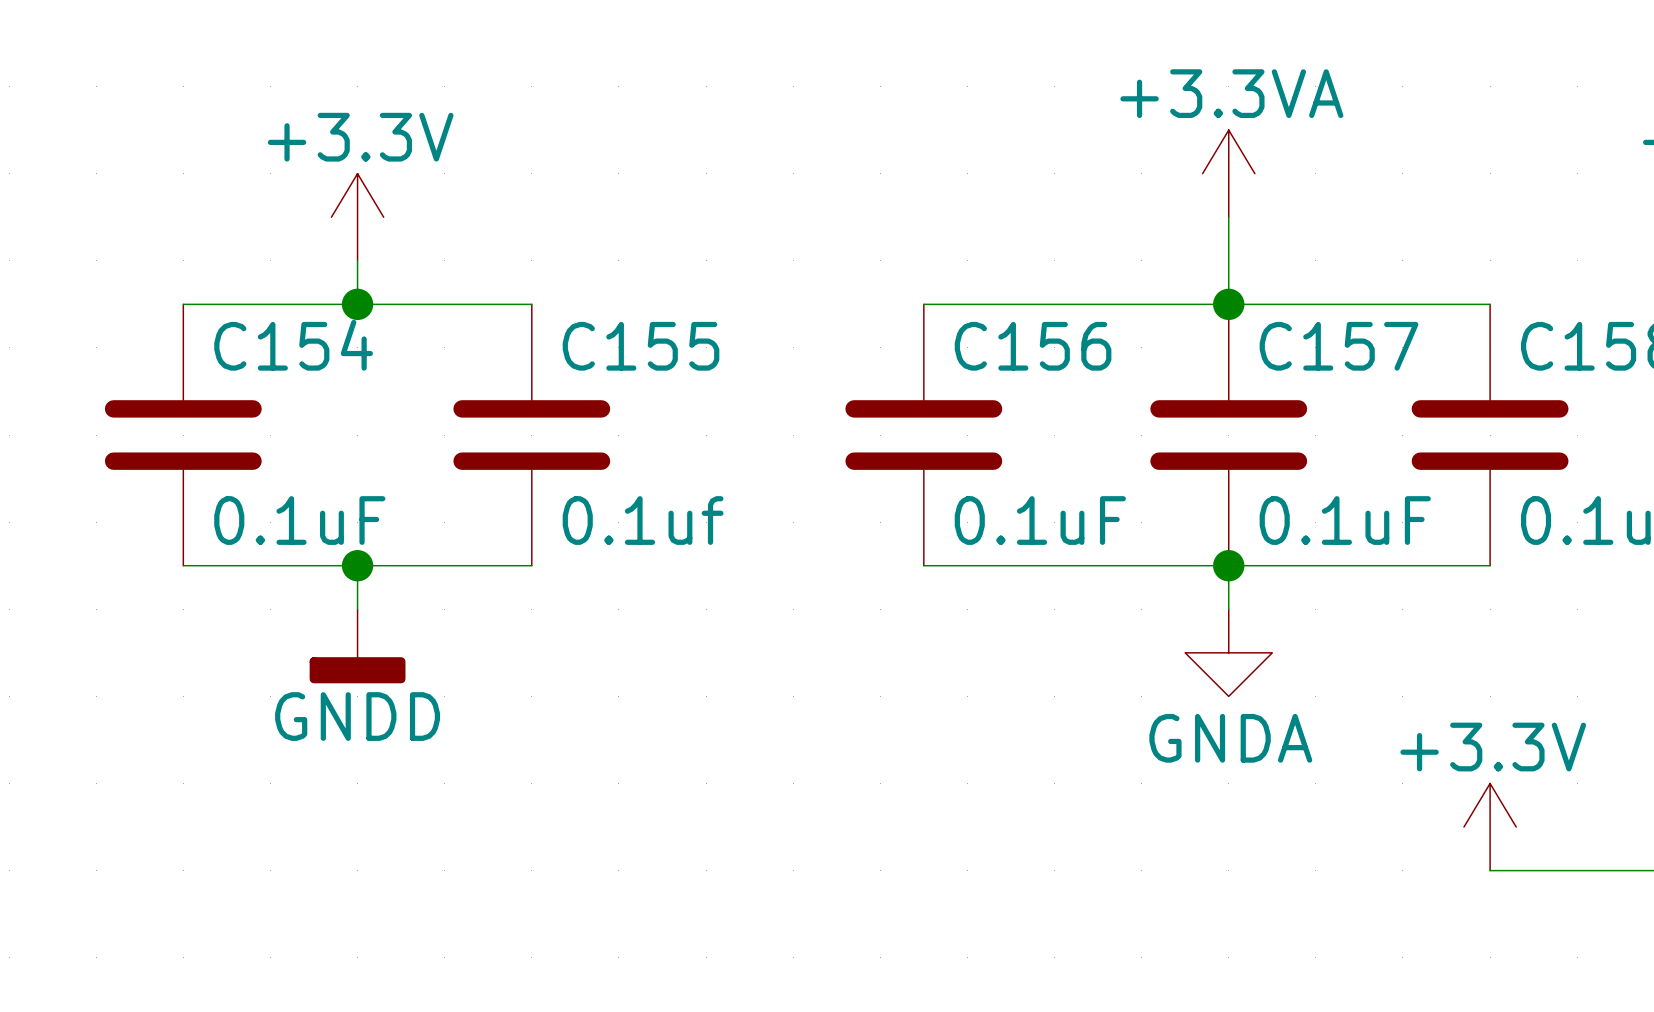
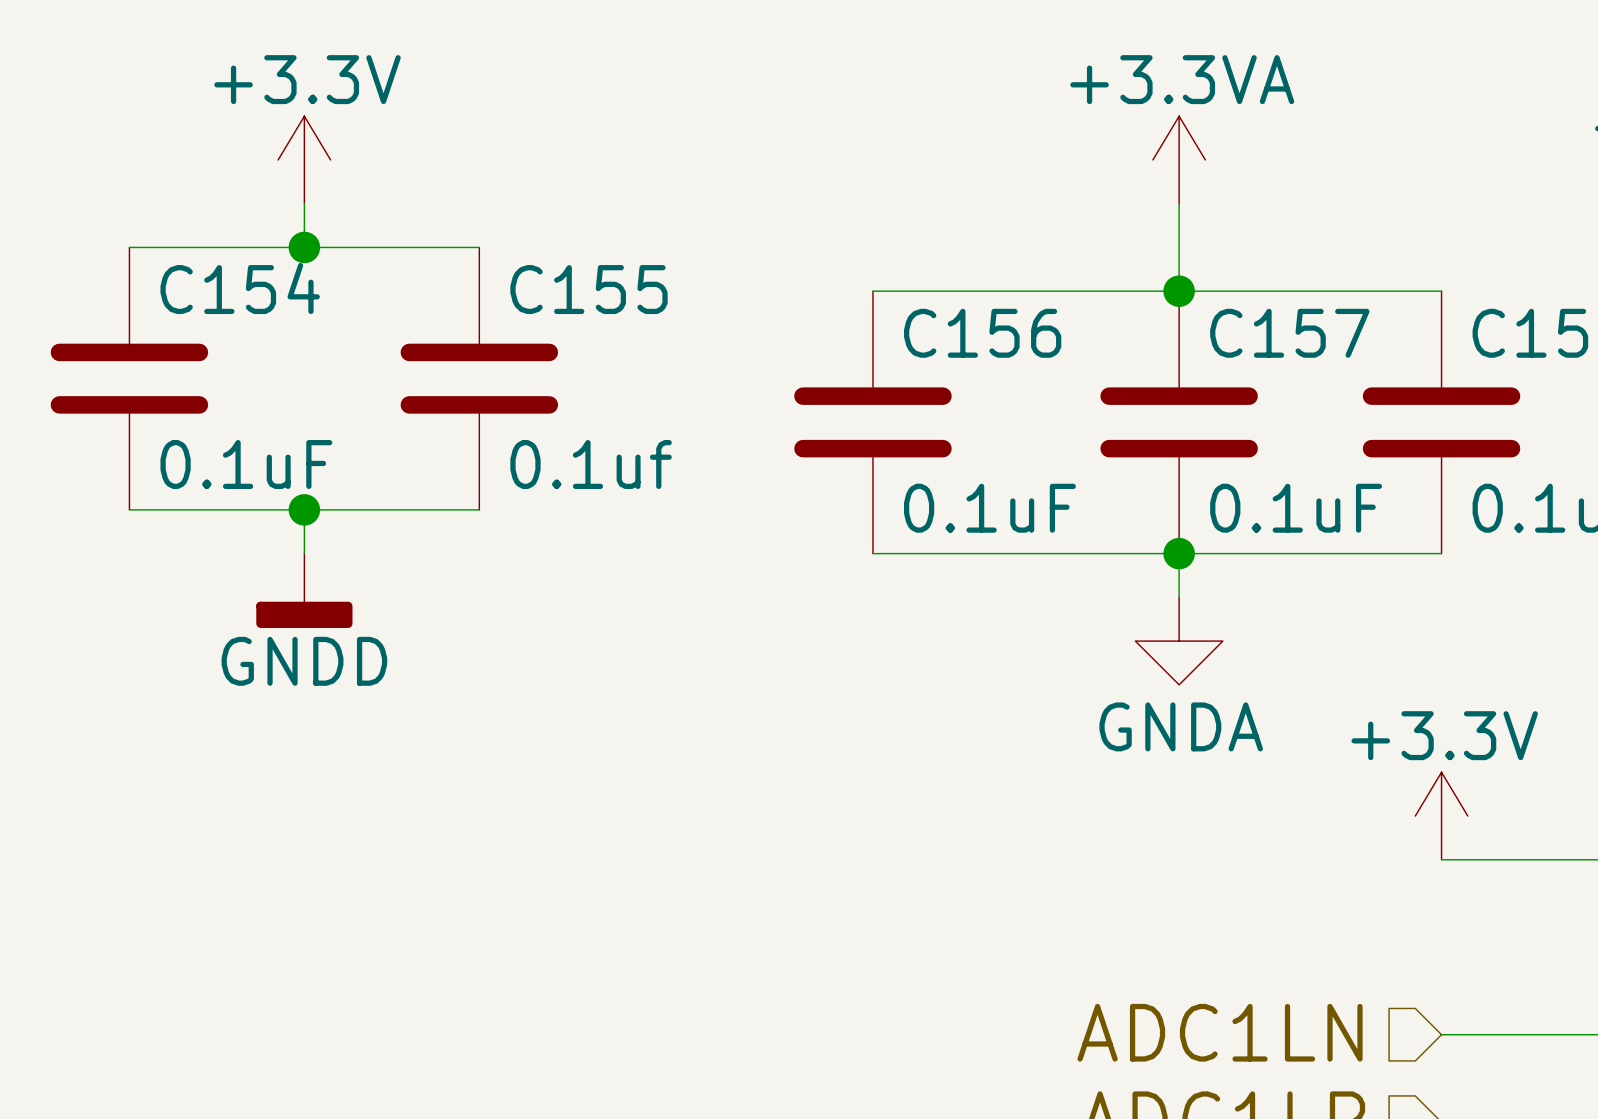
power symbol position: +3.3V (357, 217) -> +3.3V (304, 159)
wire: (183, 304) (531, 304) -> (129, 247) (479, 247)
junction position: (357, 304) -> (304, 247)
C154 position: (183, 435) -> (129, 378)
C155 position: (531, 435) -> (479, 378)
wire: (183, 565) (531, 565) -> (129, 509) (479, 509)
junction position: (357, 565) -> (304, 509)
power symbol position: GNDD (357, 646) -> GNDD (304, 590)

